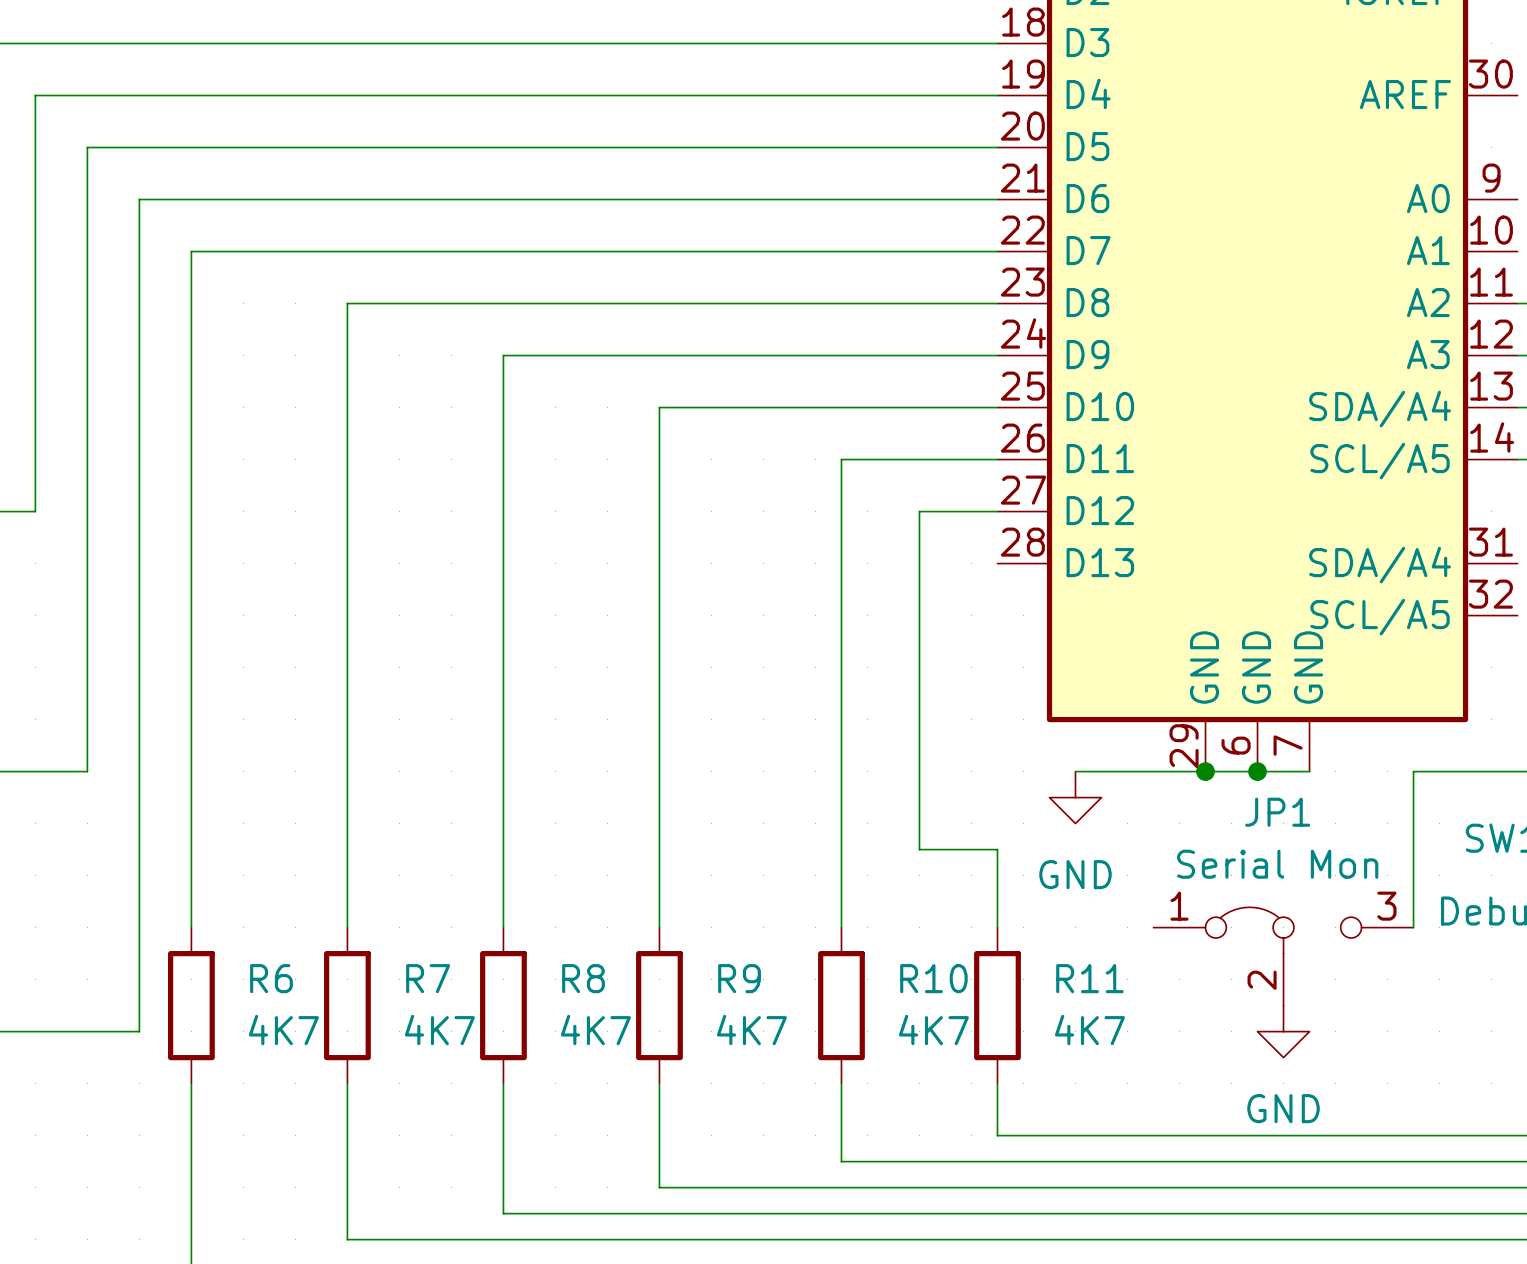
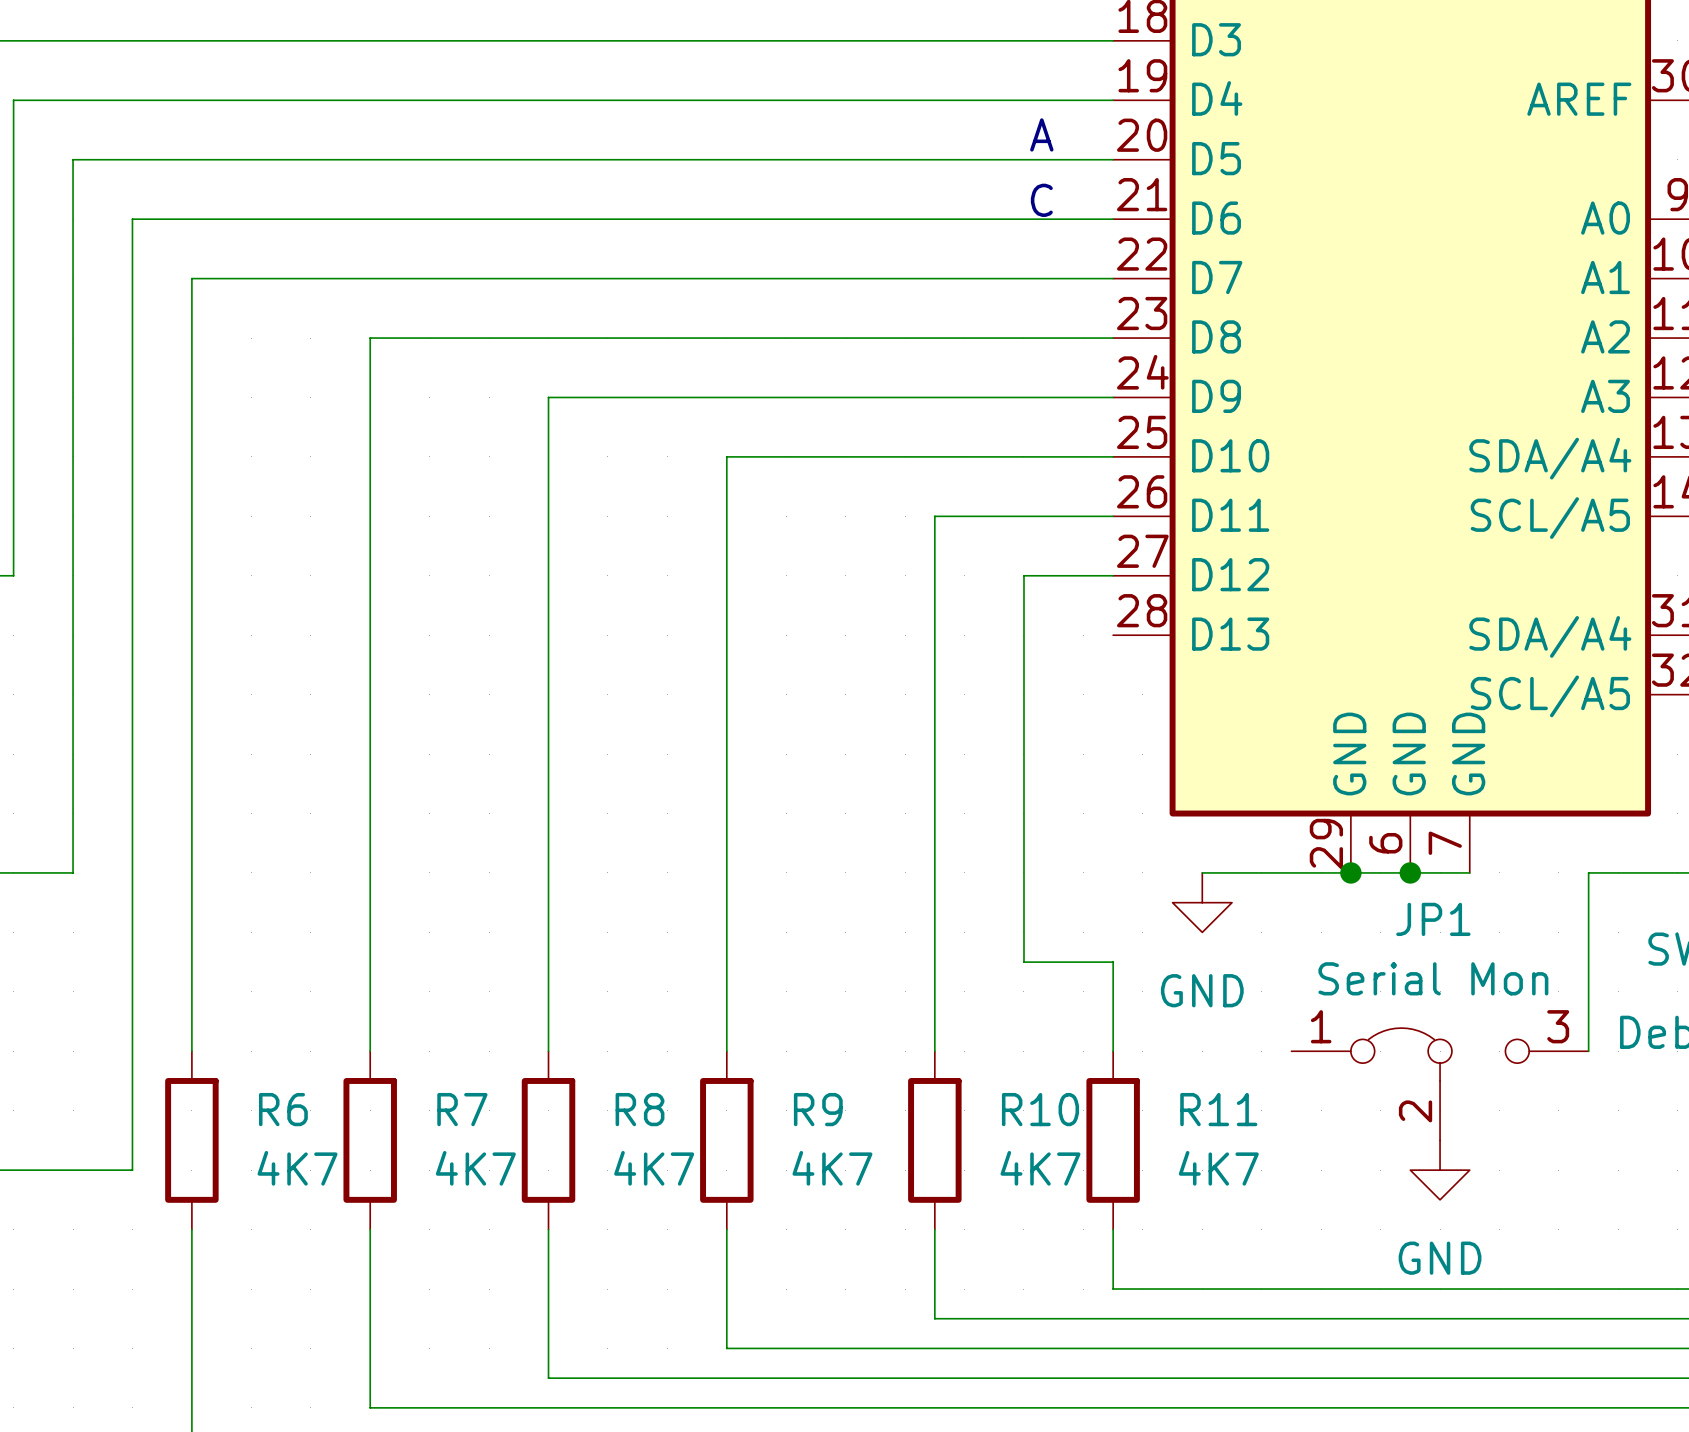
text: none -> A (1041, 134)
text: none -> C (1041, 200)

